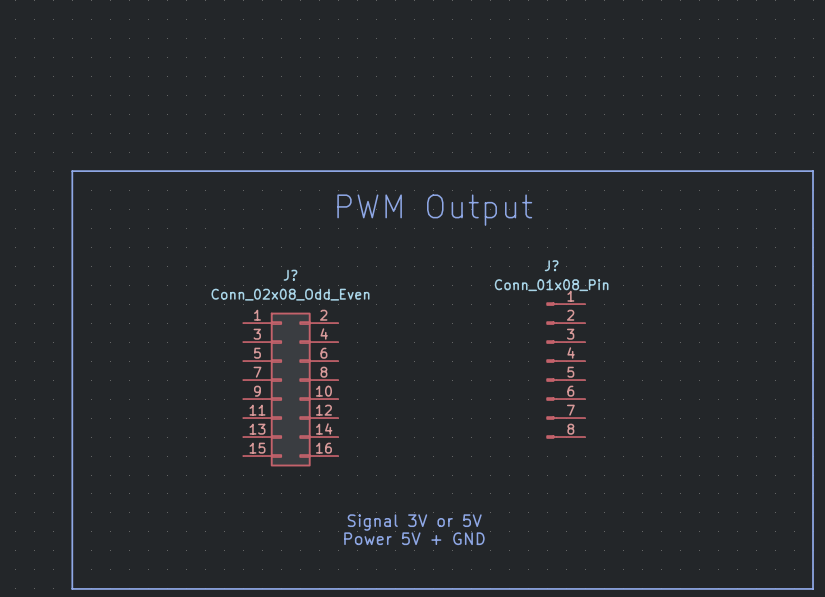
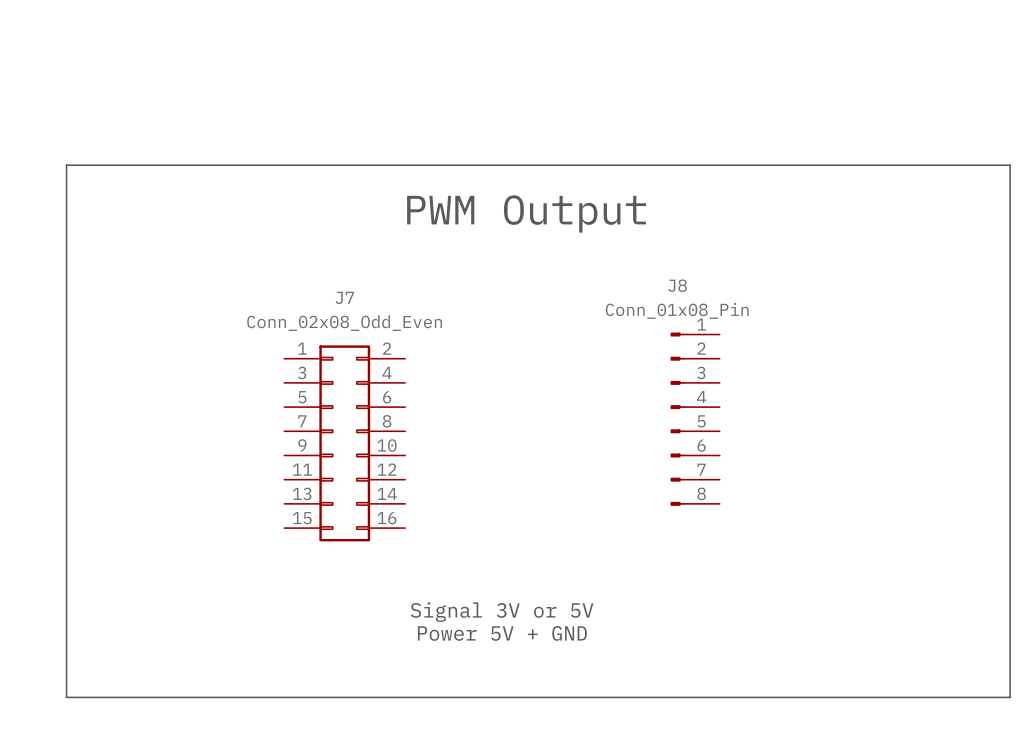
J? name: J? (551, 265) -> J8 (677, 285)
J? name: J? (290, 275) -> J7 (344, 297)

